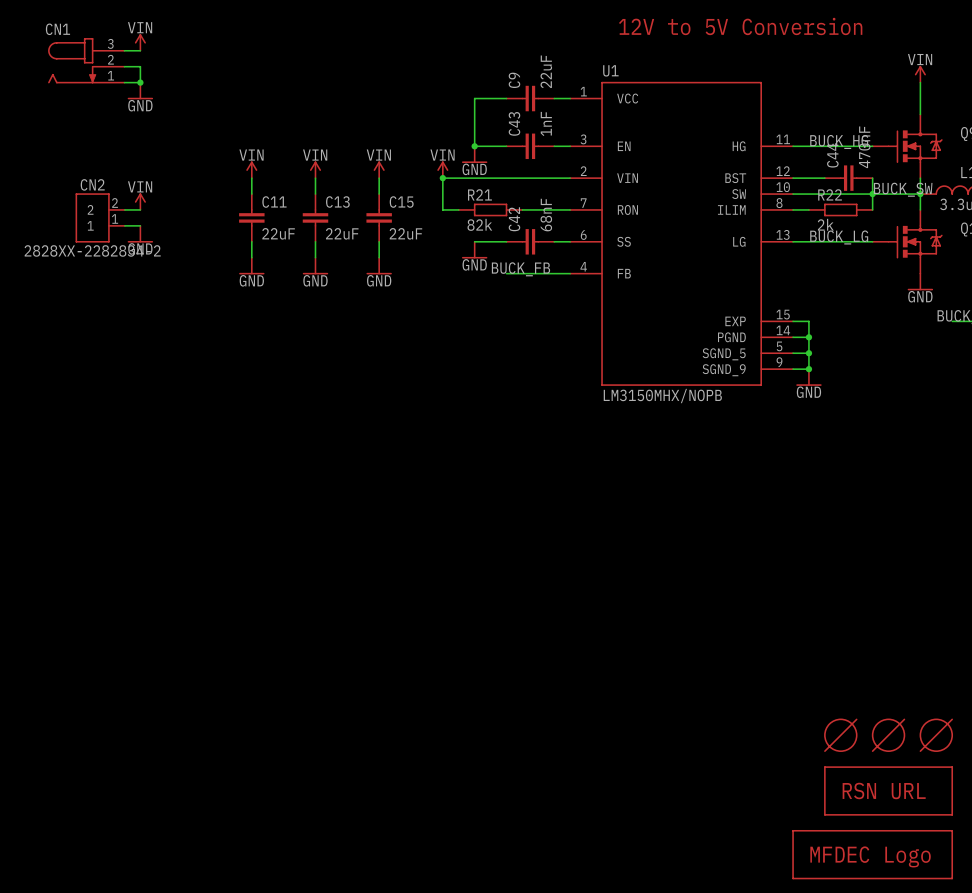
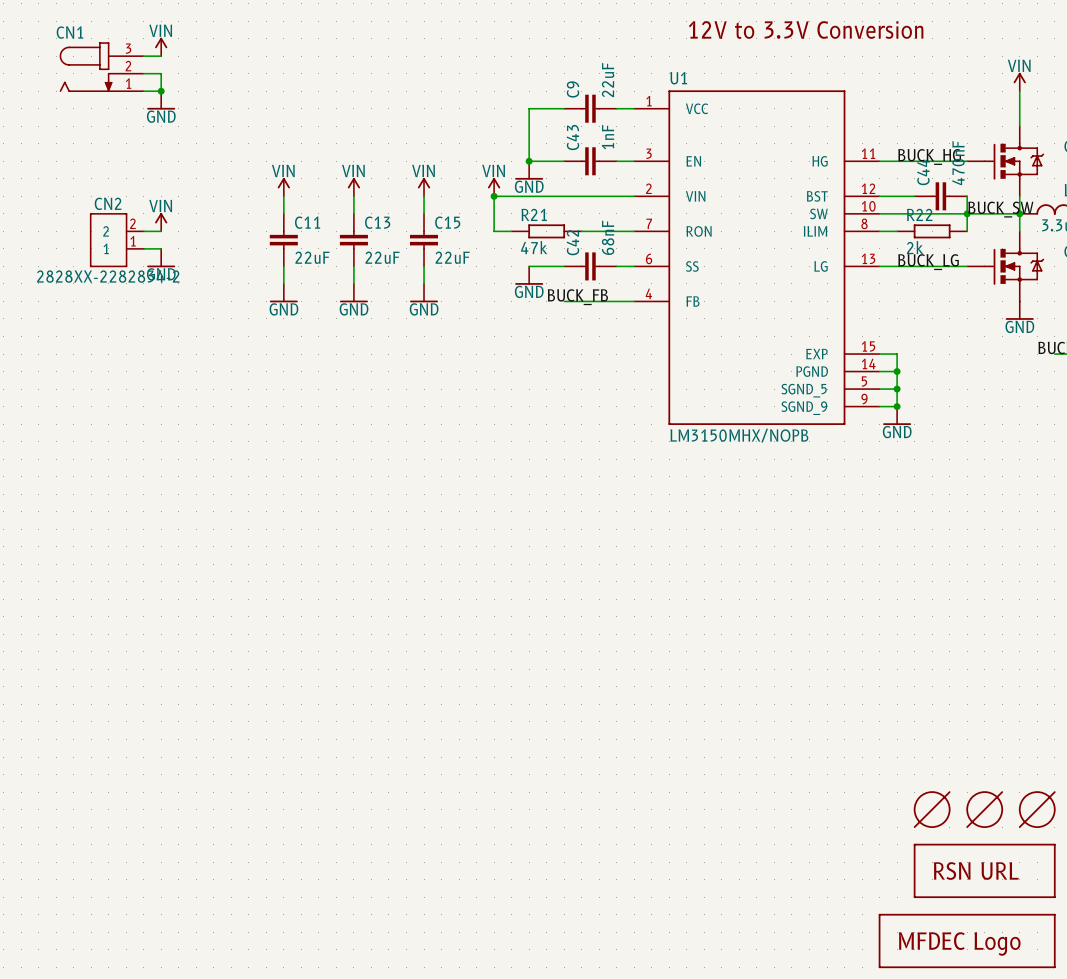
text: 12V to 5V Conversion (740, 26) -> 12V to 3.3V Conversion (806, 29)
R21 value: 82k (479, 224) -> 47k (534, 247)

